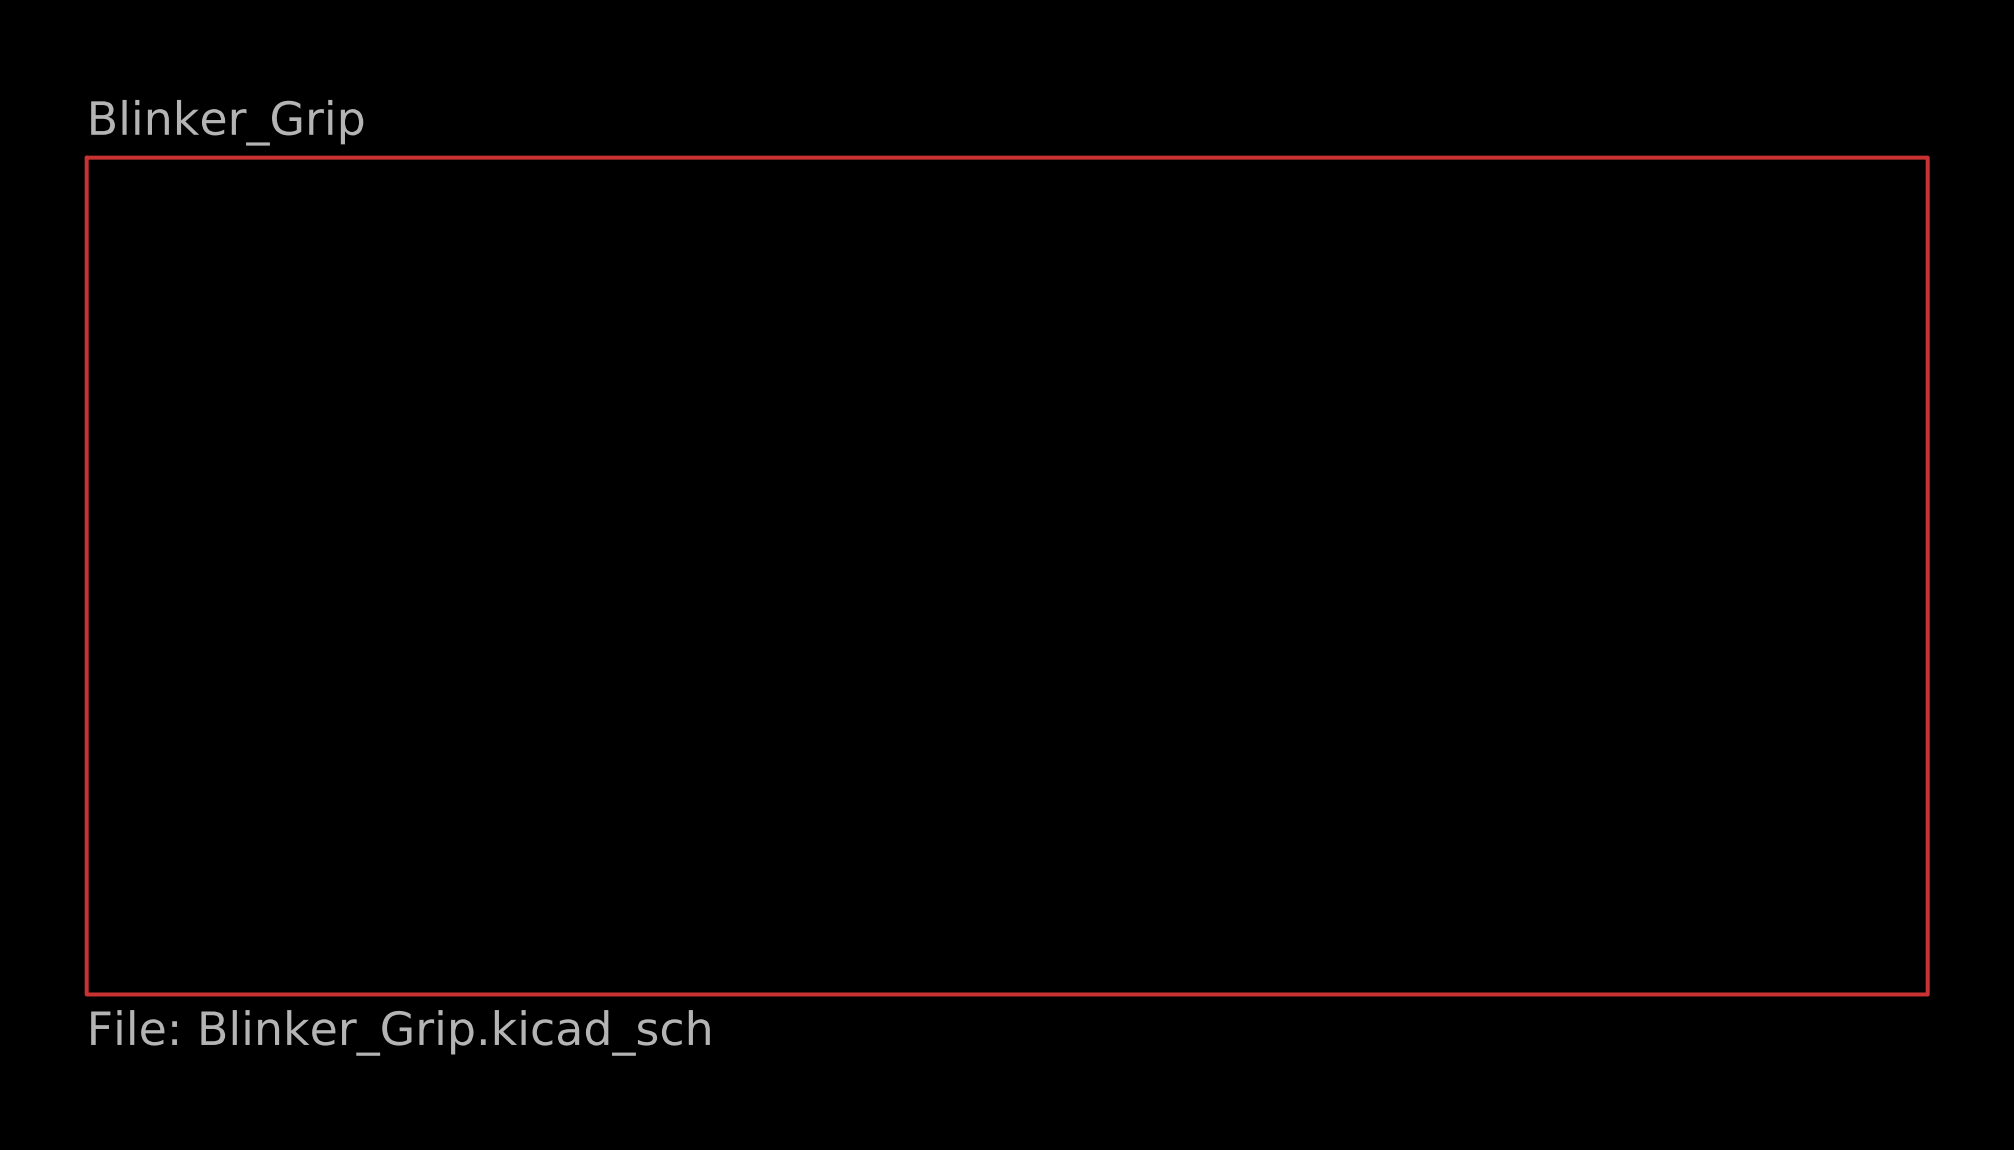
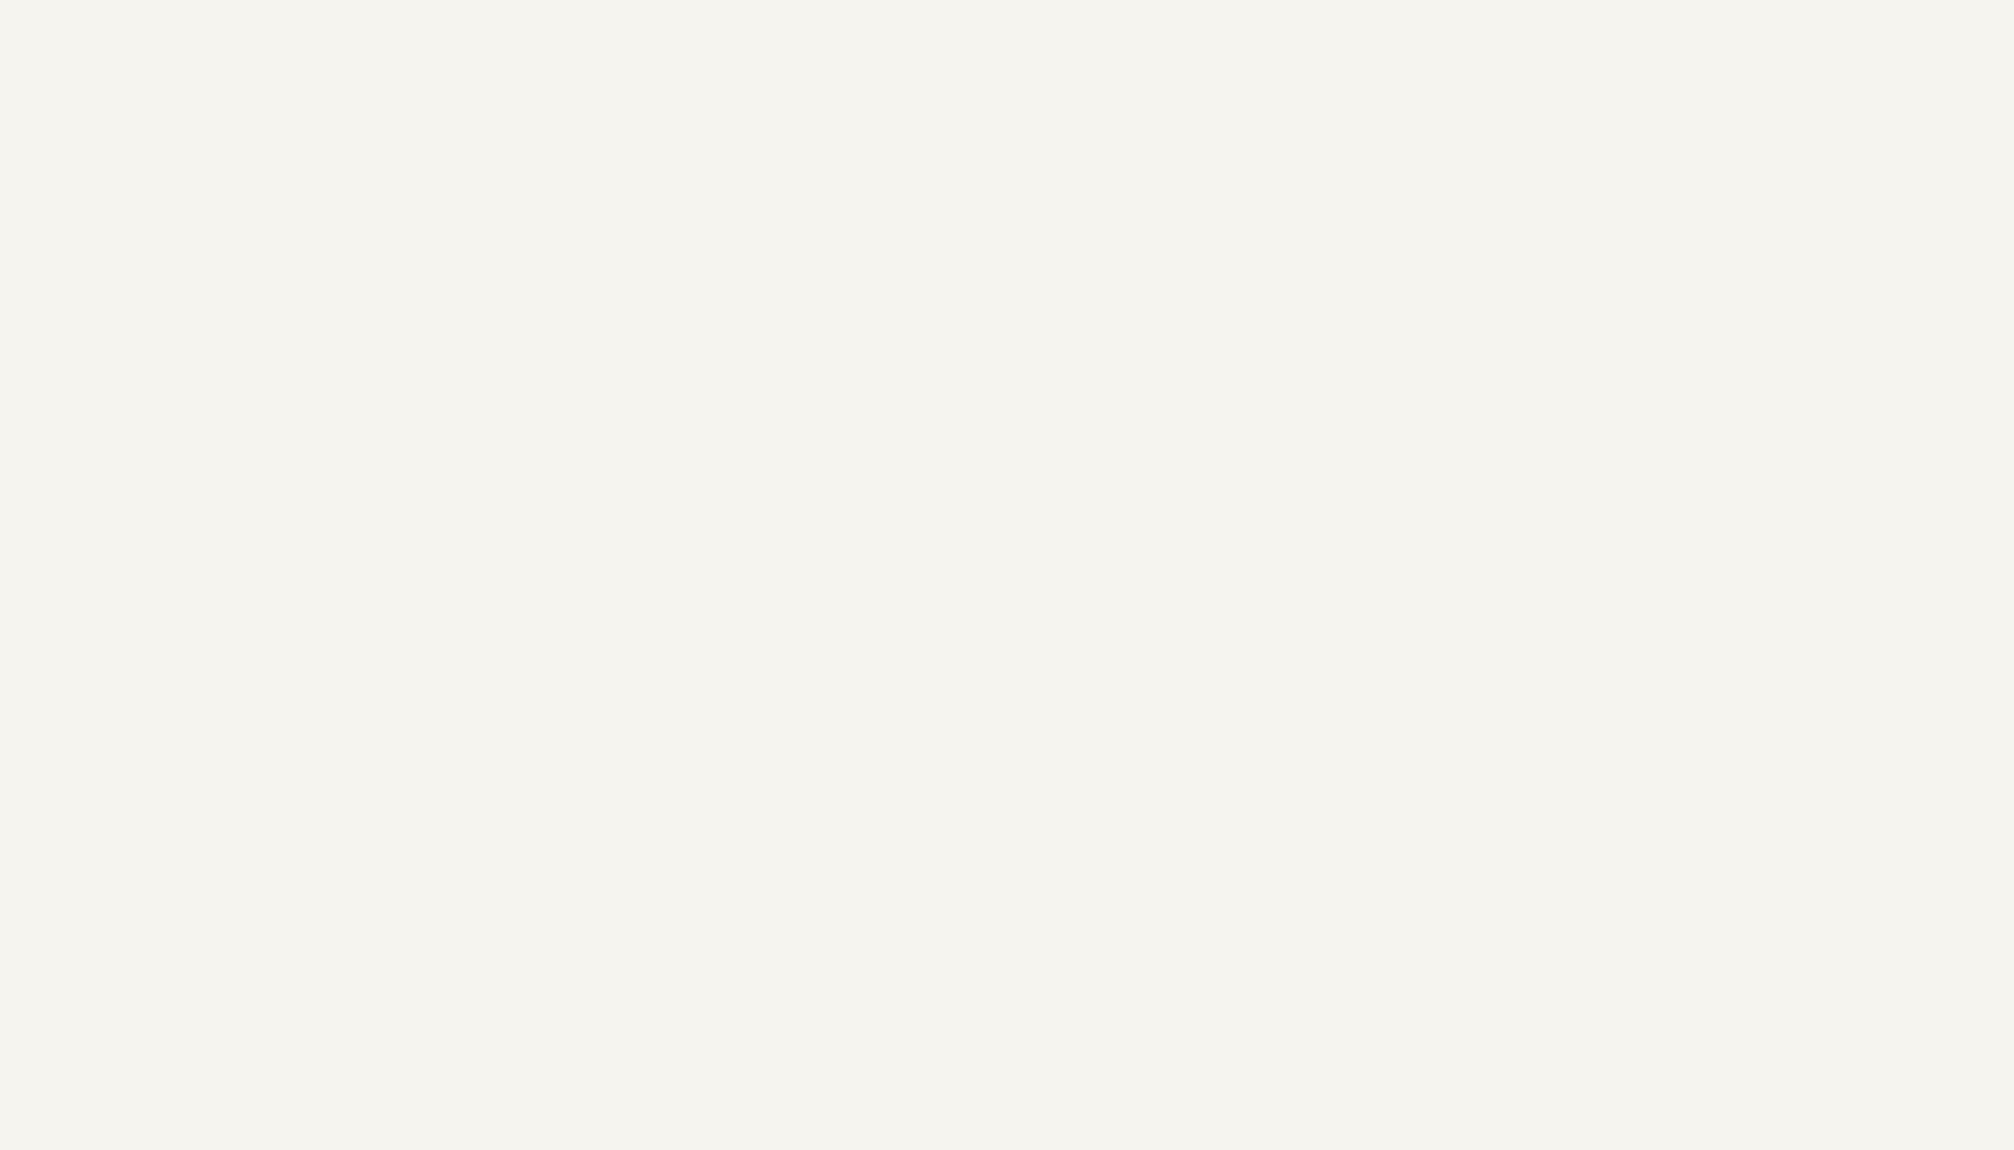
sheet Blinker_Grip: File: Blinker_Grip.kicad_sch (1007, 576) -> none

